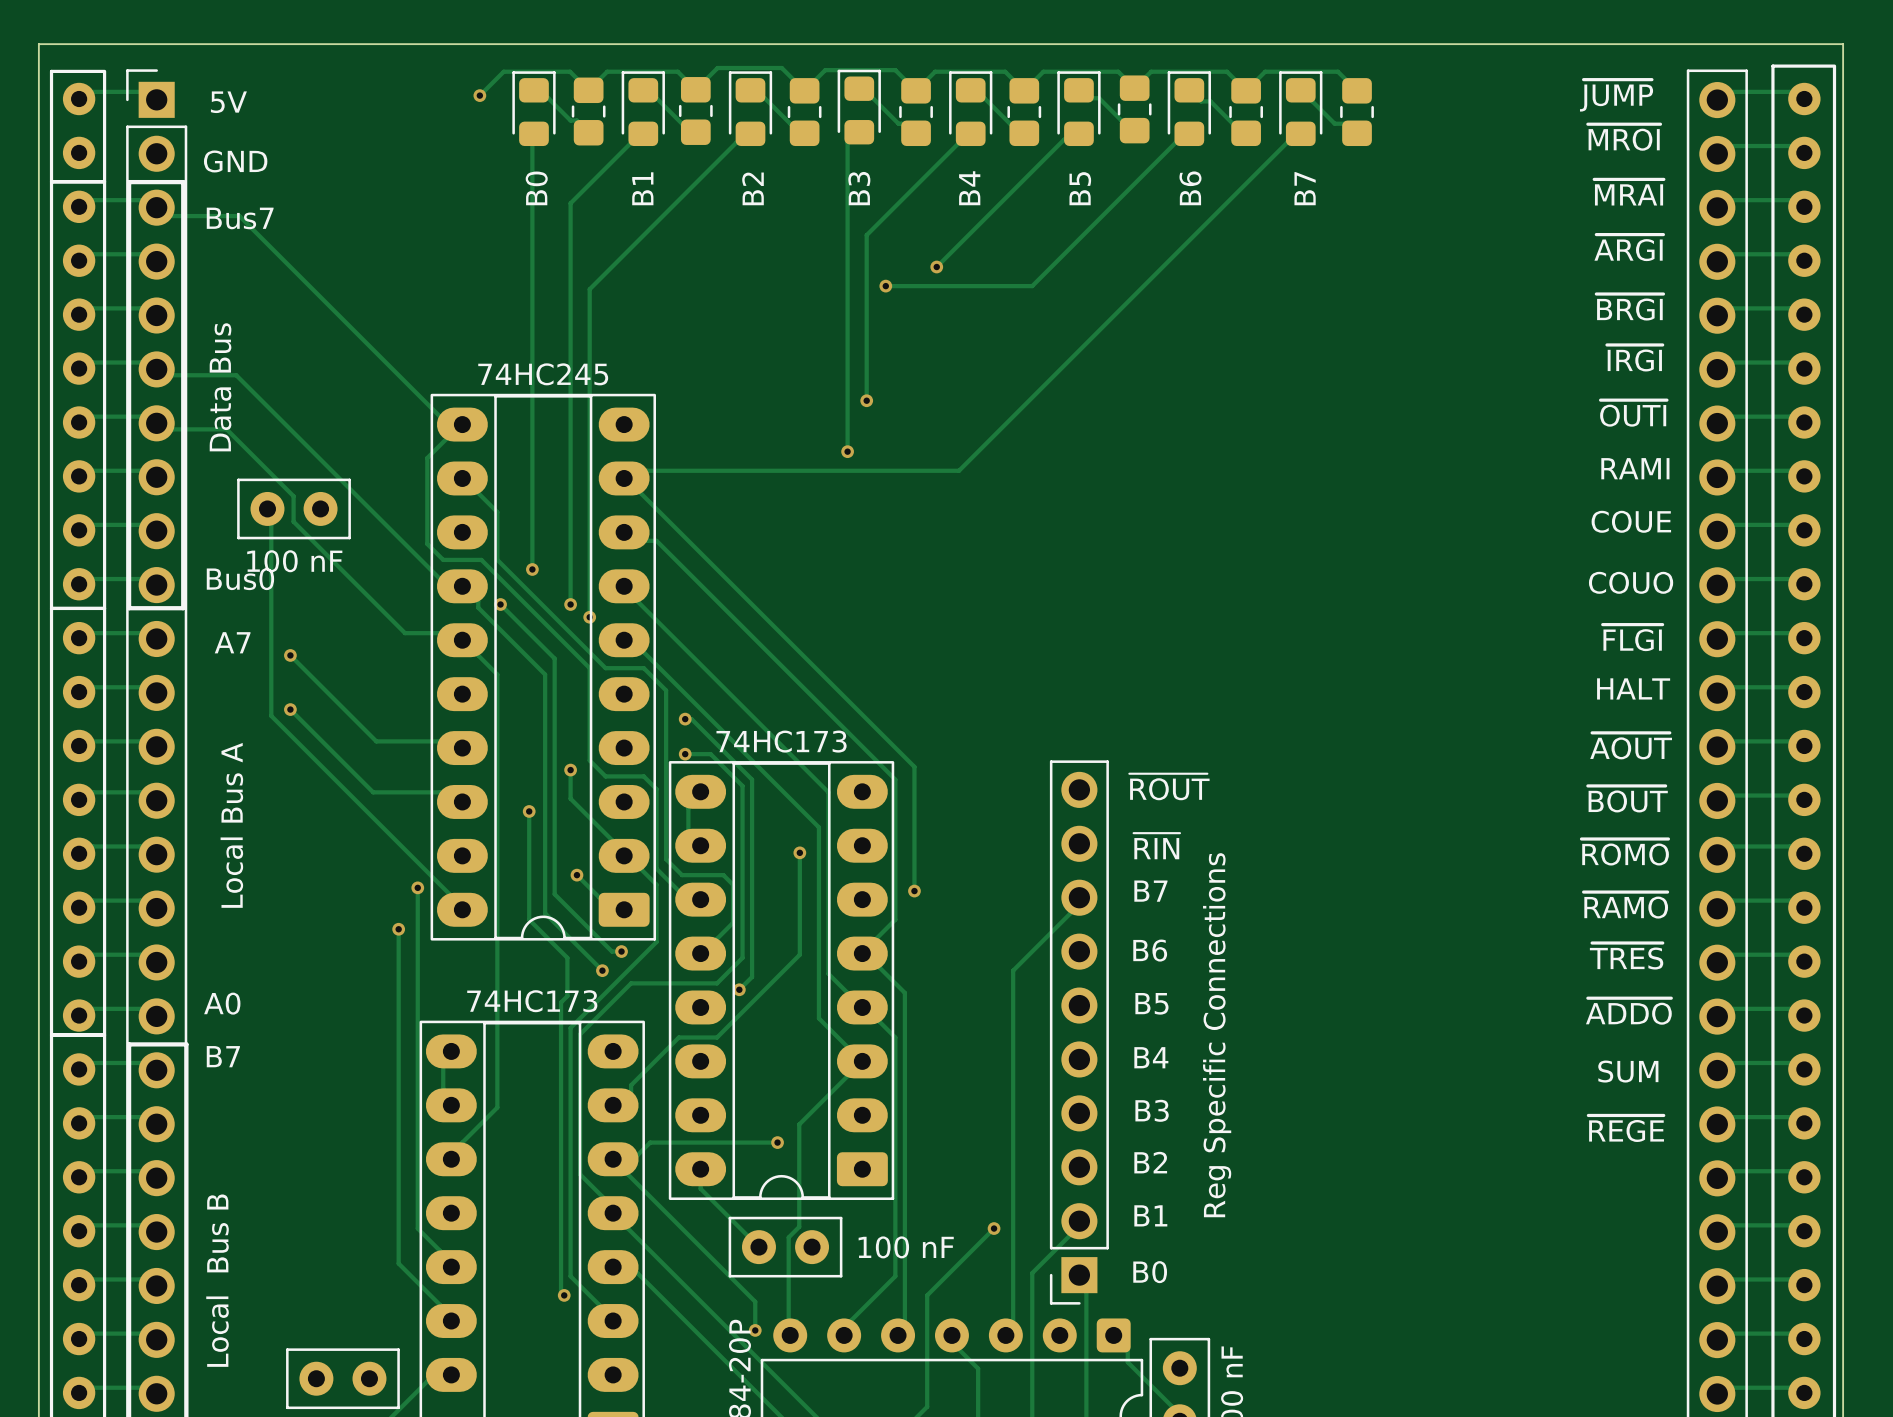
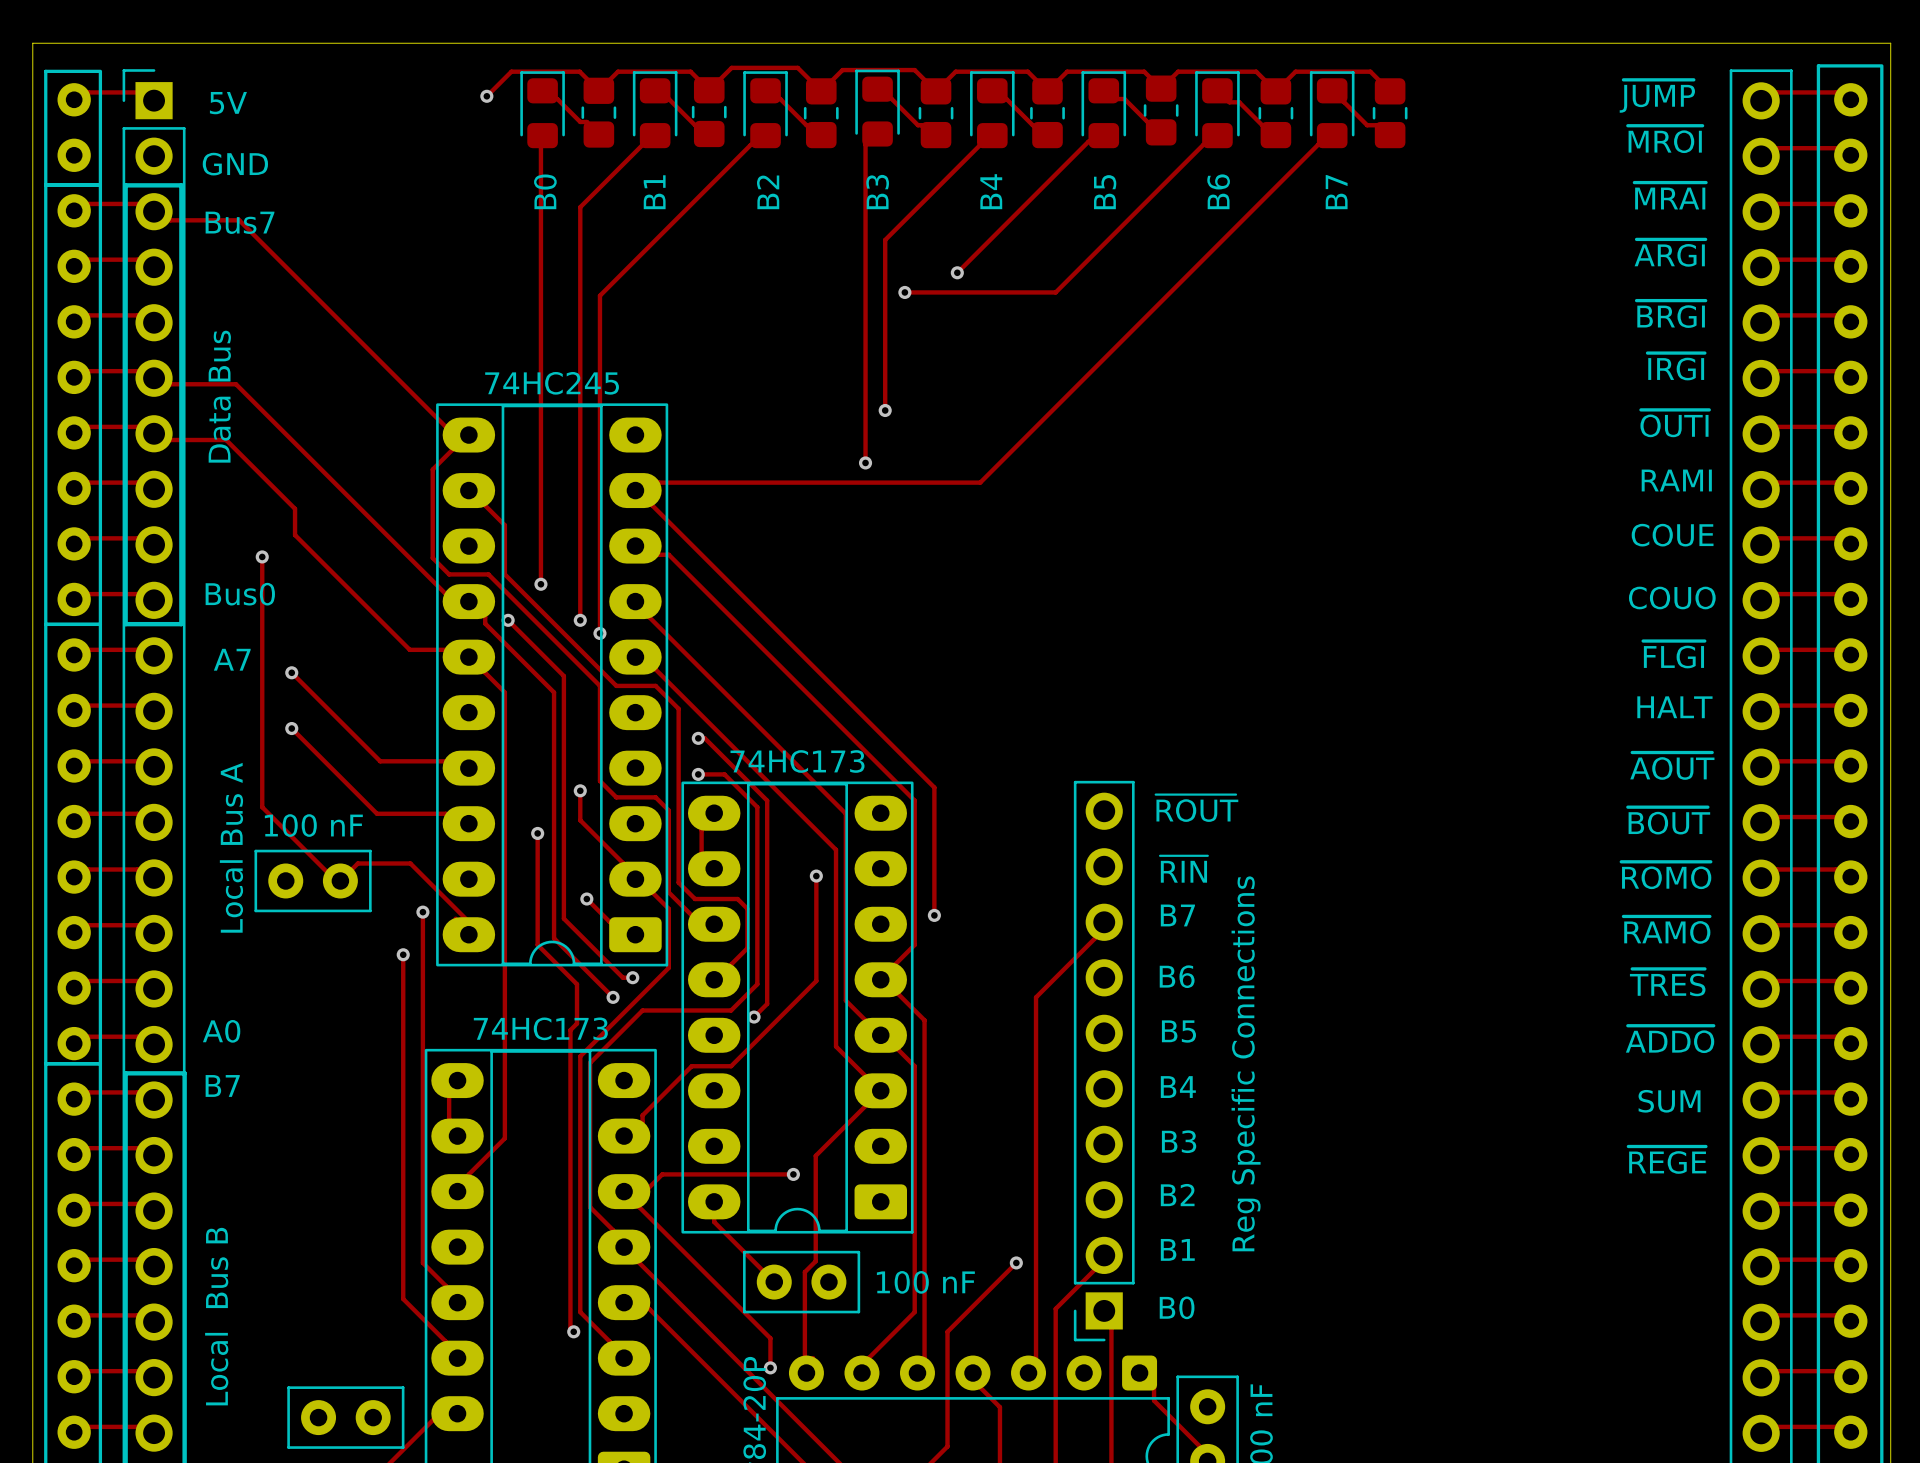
track: (267, 508) (271, 524) (271, 715) (449, 894) -> none
part position: (294, 508) -> (313, 880)
track: none -> (262, 556) (262, 807) (336, 880) (340, 880) (357, 863) (410, 863) (468, 921) (468, 934)
via: none -> (262, 556)
part value position: 100 nF (294, 561) -> 100 nF (313, 825)

